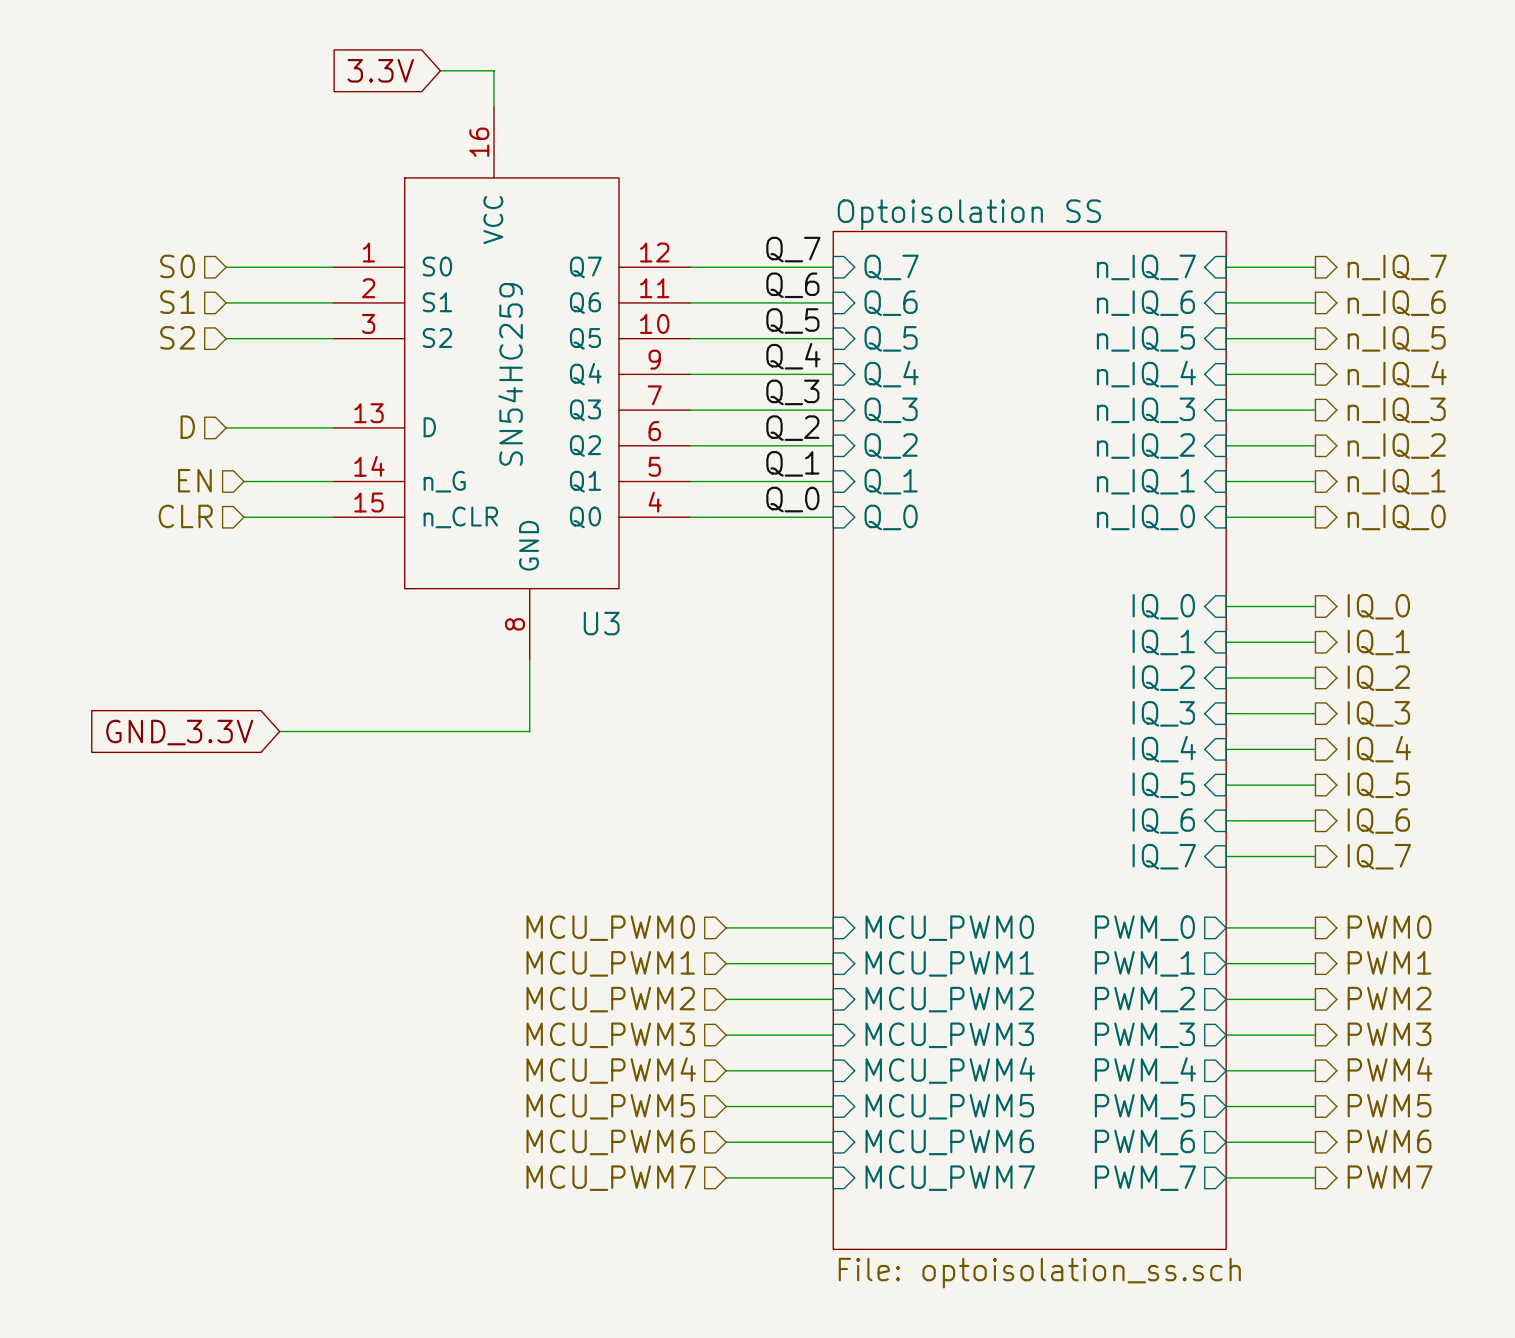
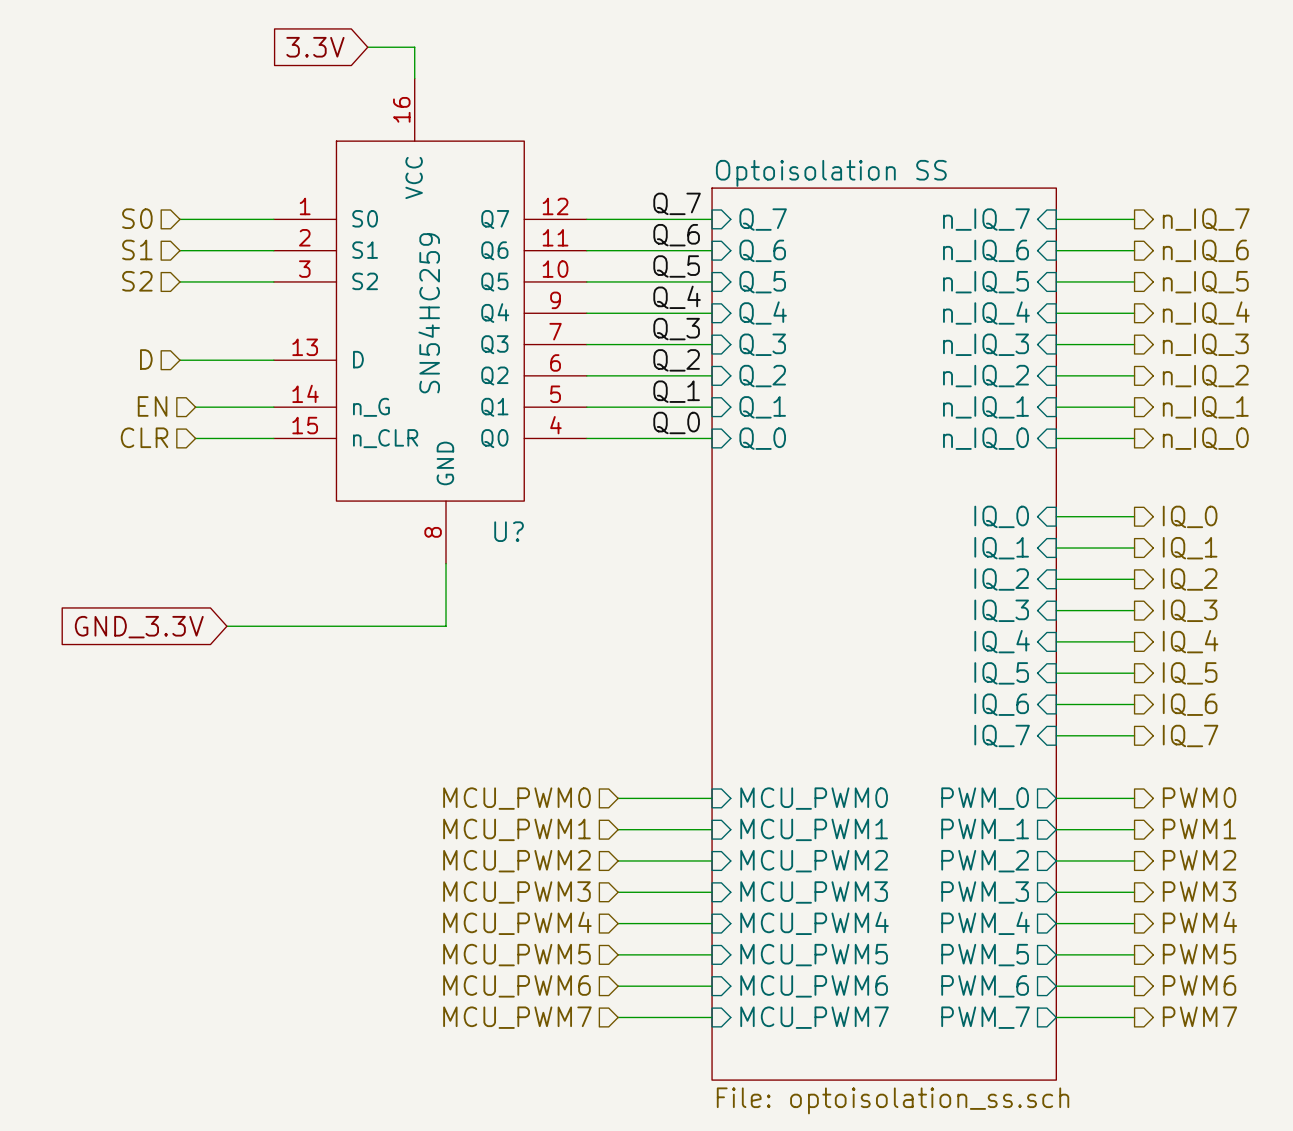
U3 name: U3 (601, 623) -> U? (509, 531)

